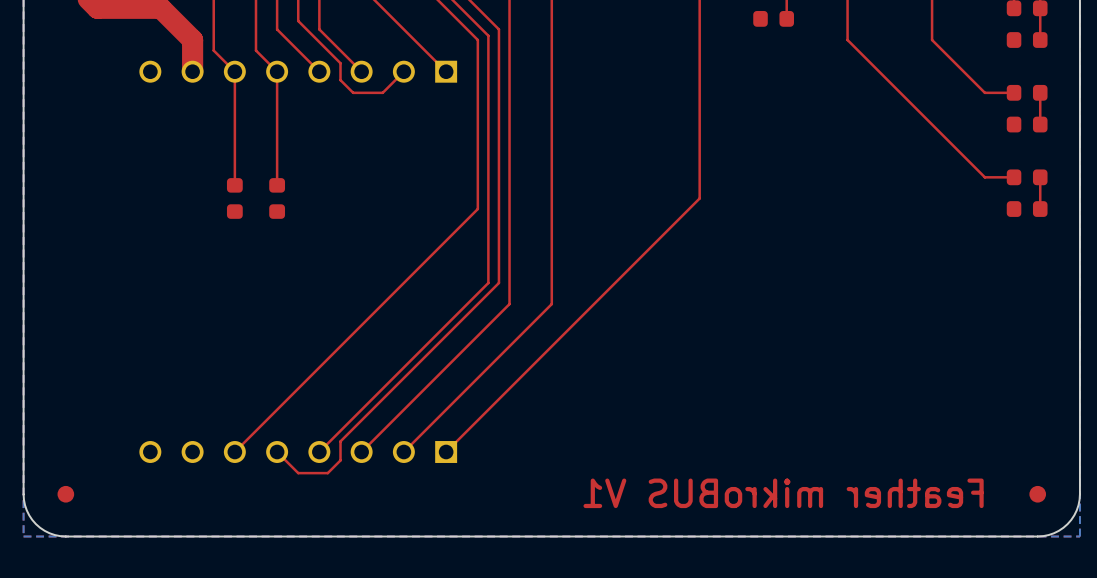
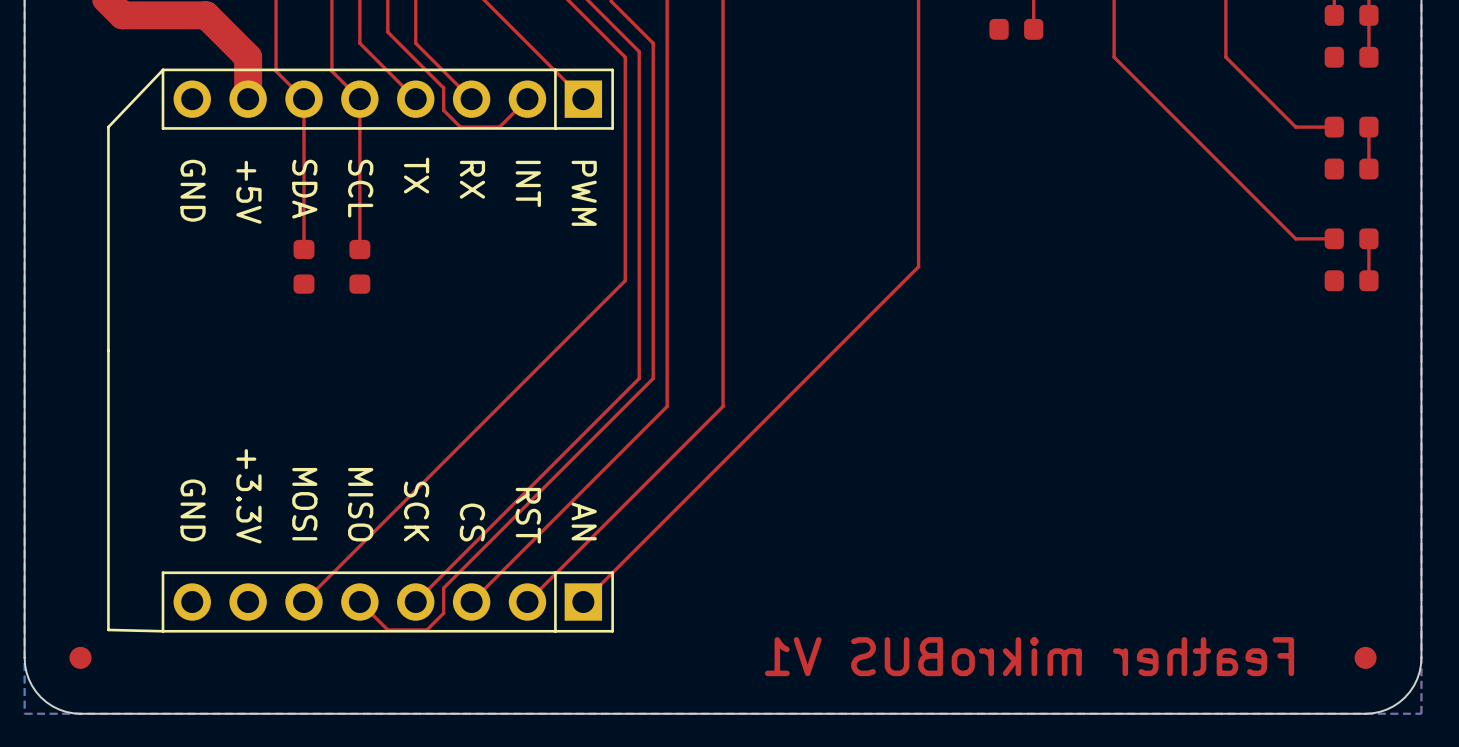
part: (298, 71) -> none
part: none -> (360, 210)
part: none -> (360, 490)
part: (298, 452) -> none

